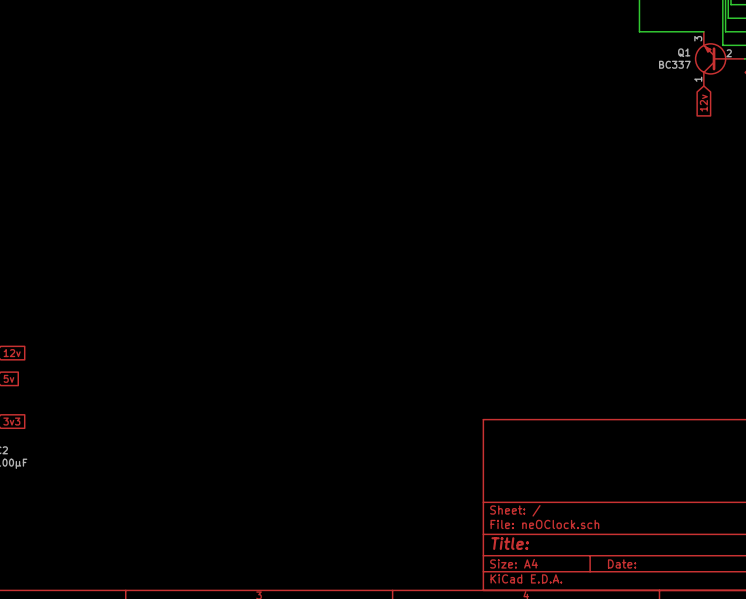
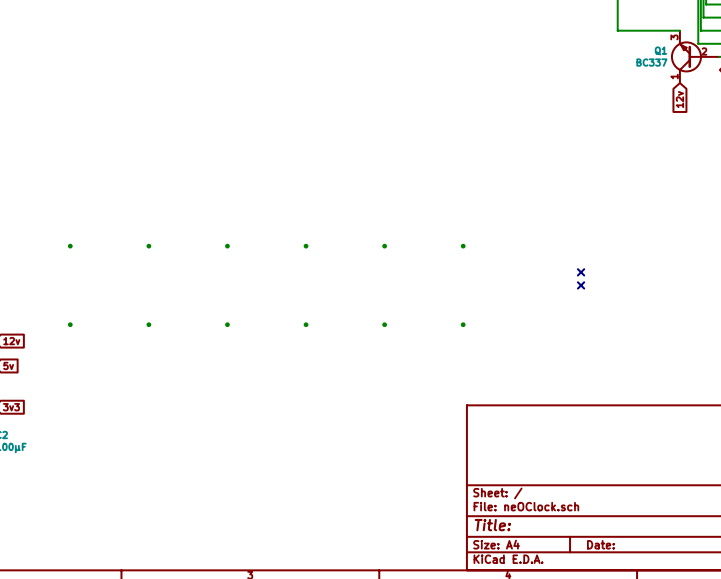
junction: none -> (70, 246)
junction: none -> (148, 246)
junction: none -> (227, 246)
junction: none -> (306, 246)
junction: none -> (384, 246)
junction: none -> (463, 246)
no-connect mark: none -> (581, 272)
no-connect mark: none -> (581, 285)
junction: none -> (70, 324)
junction: none -> (148, 324)
junction: none -> (227, 324)
junction: none -> (306, 324)
junction: none -> (384, 324)
junction: none -> (463, 324)

